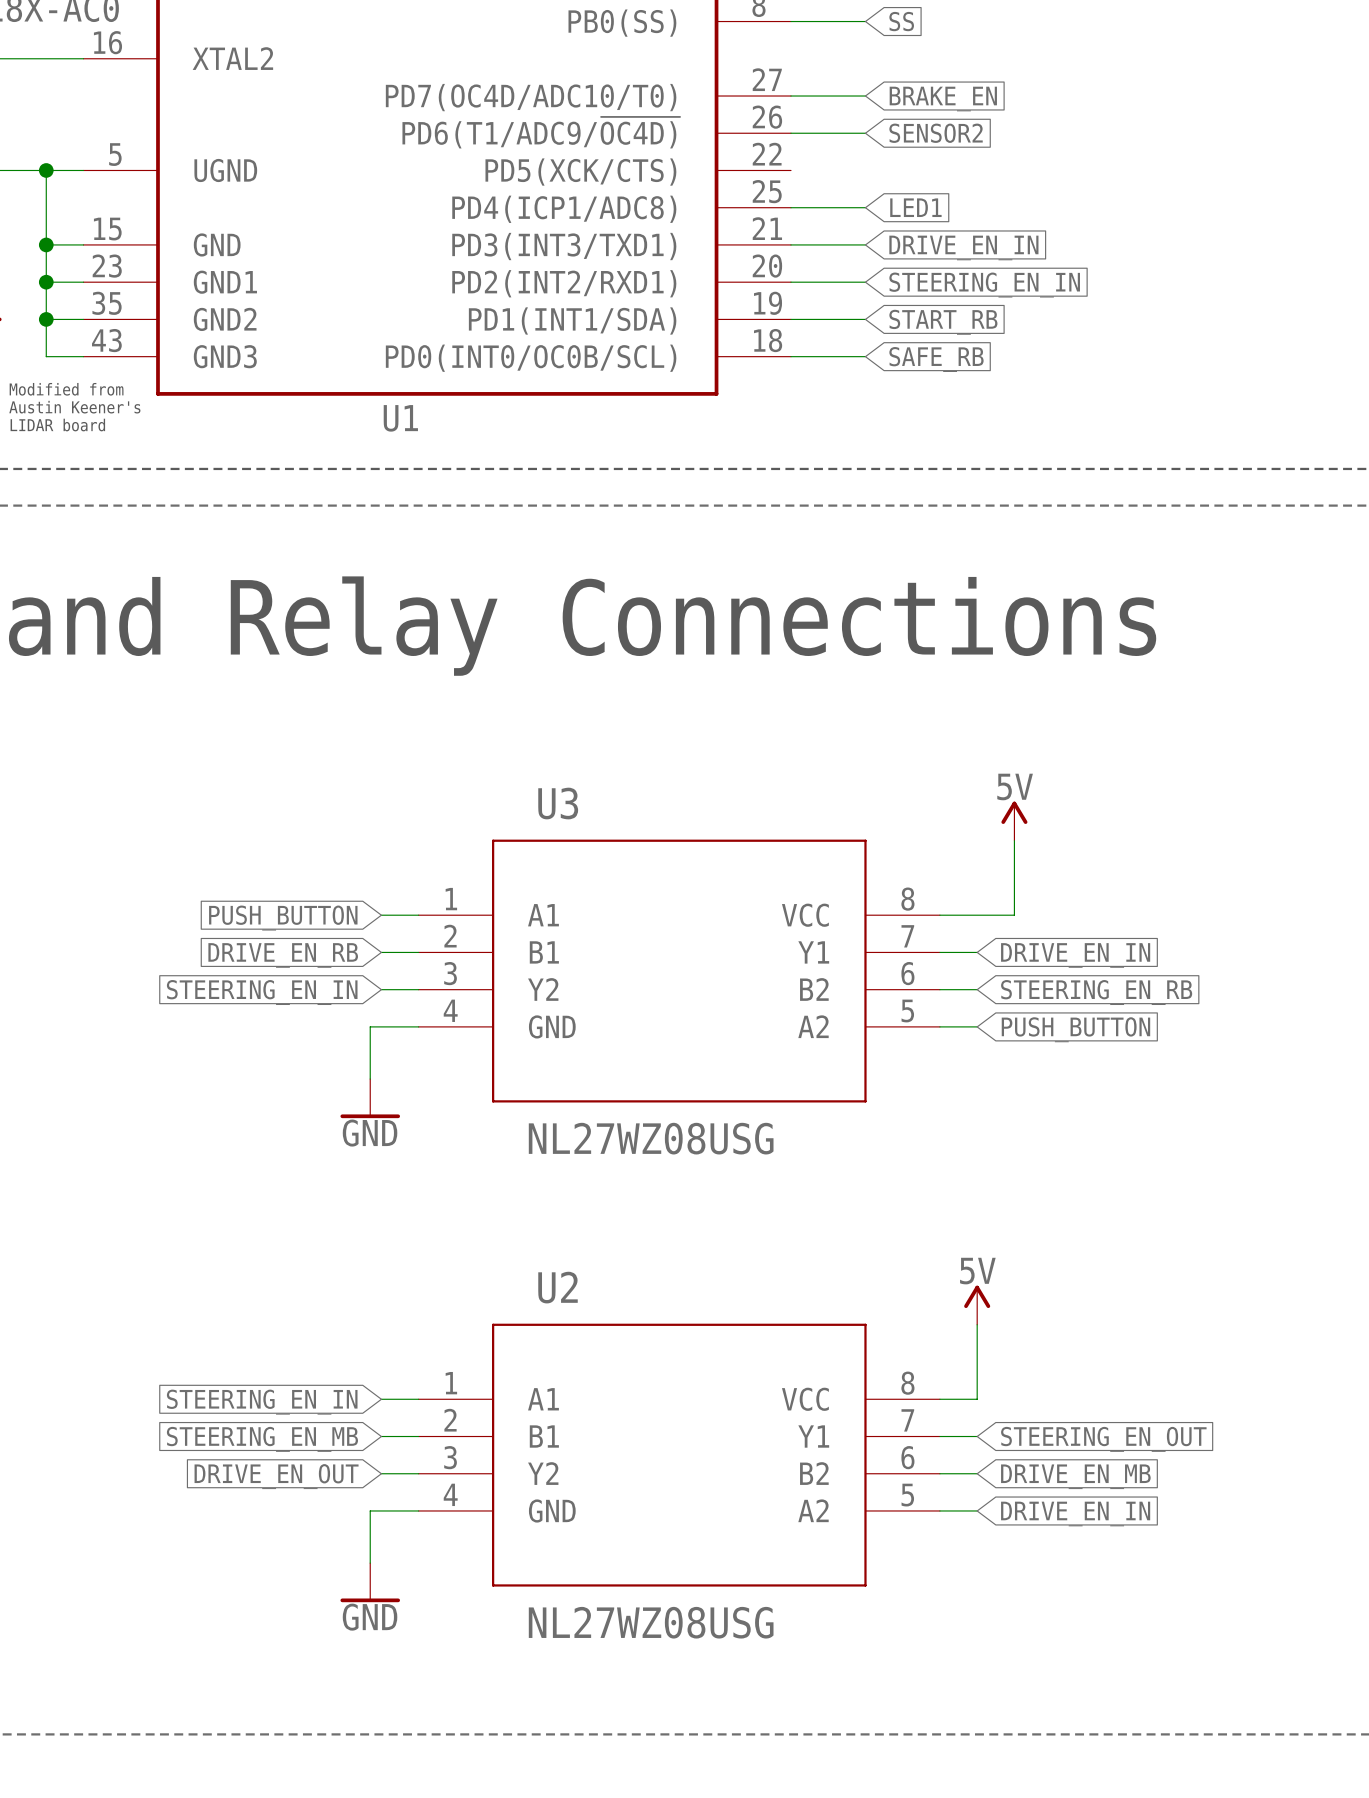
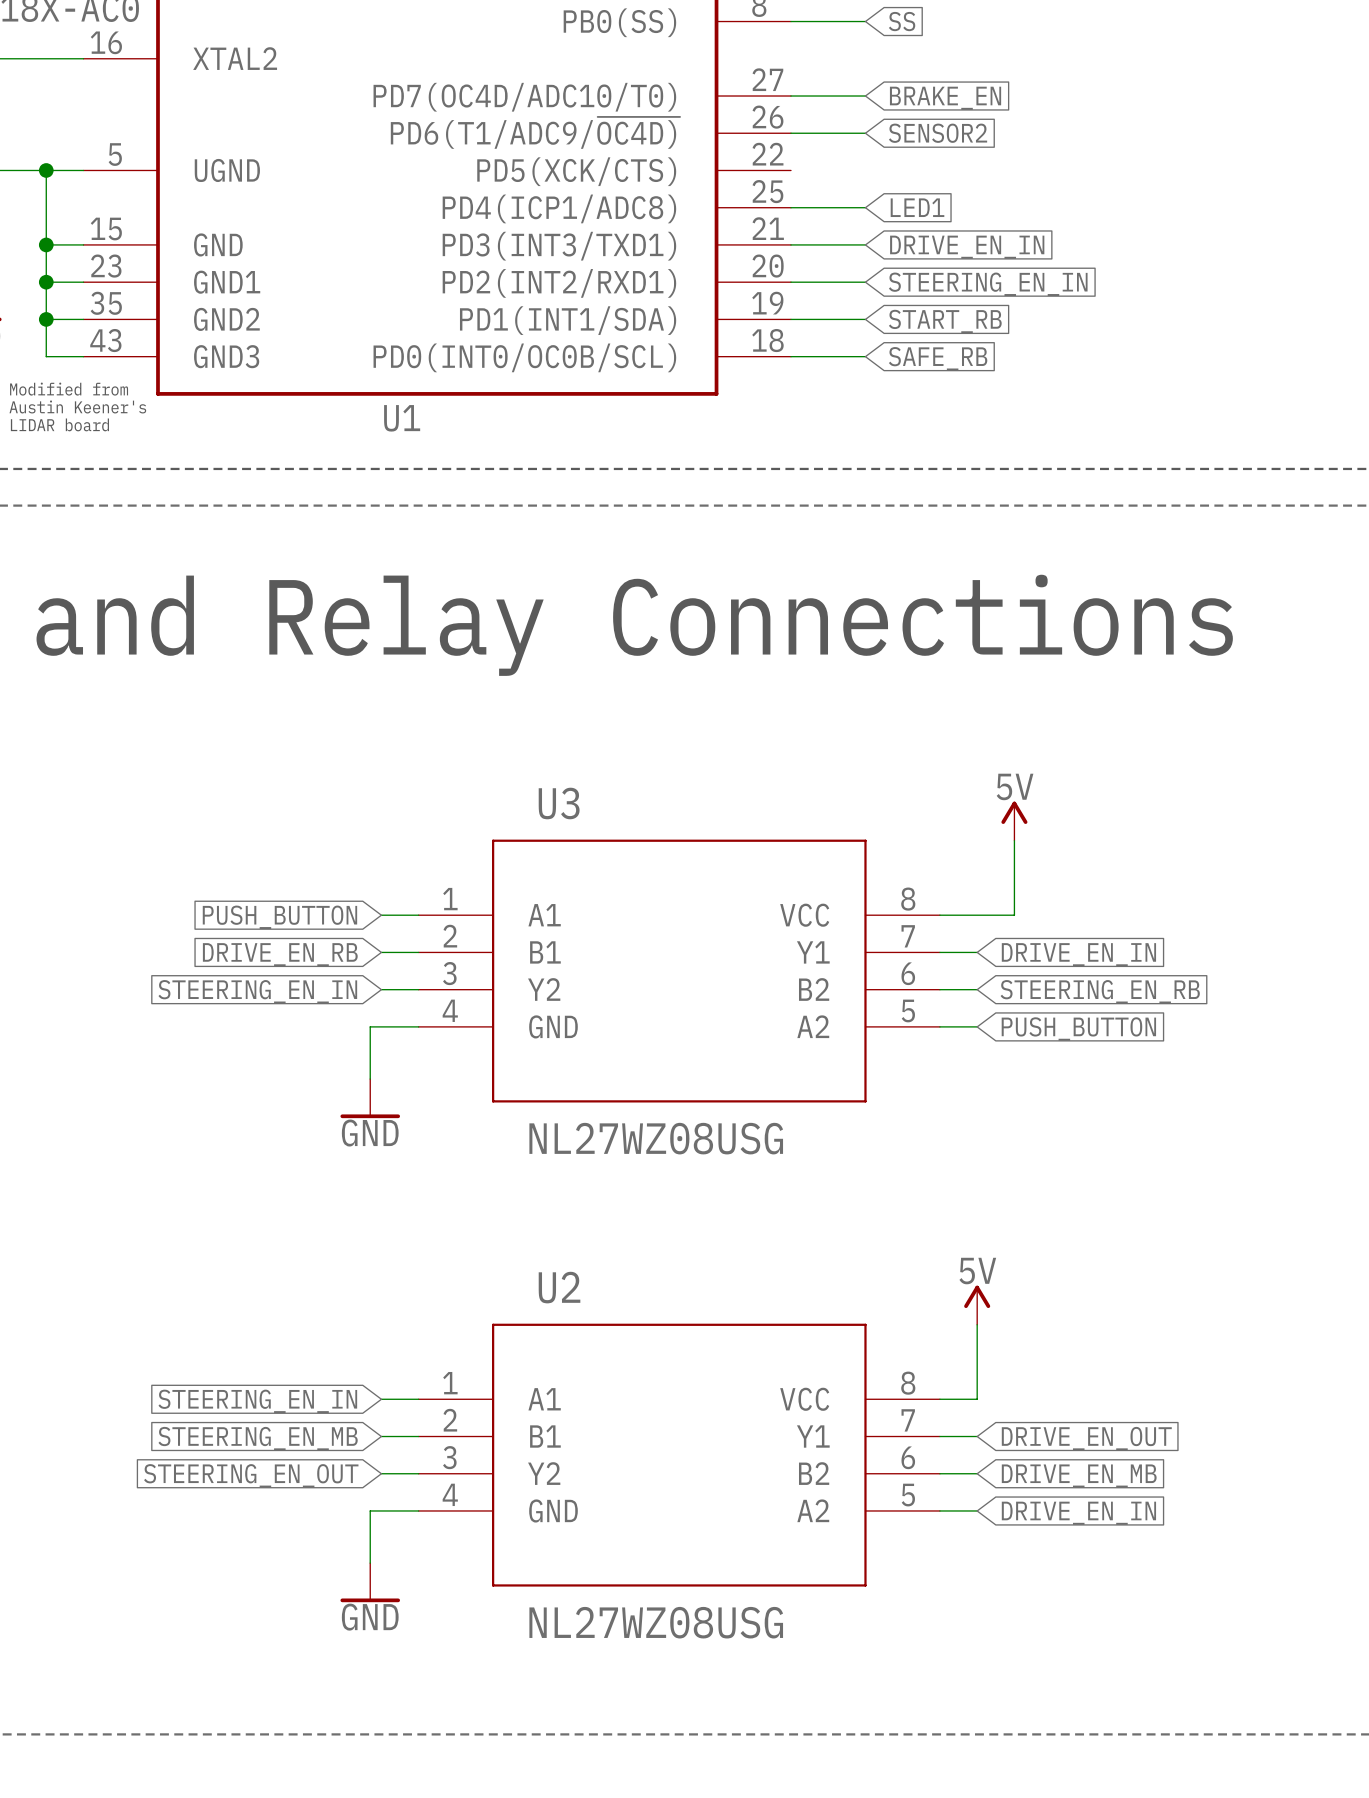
global label: STEERING_EN_OUT (1103, 1439) -> DRIVE_EN_OUT (1086, 1438)
global label: DRIVE_EN_OUT (276, 1476) -> STEERING_EN_OUT (251, 1475)

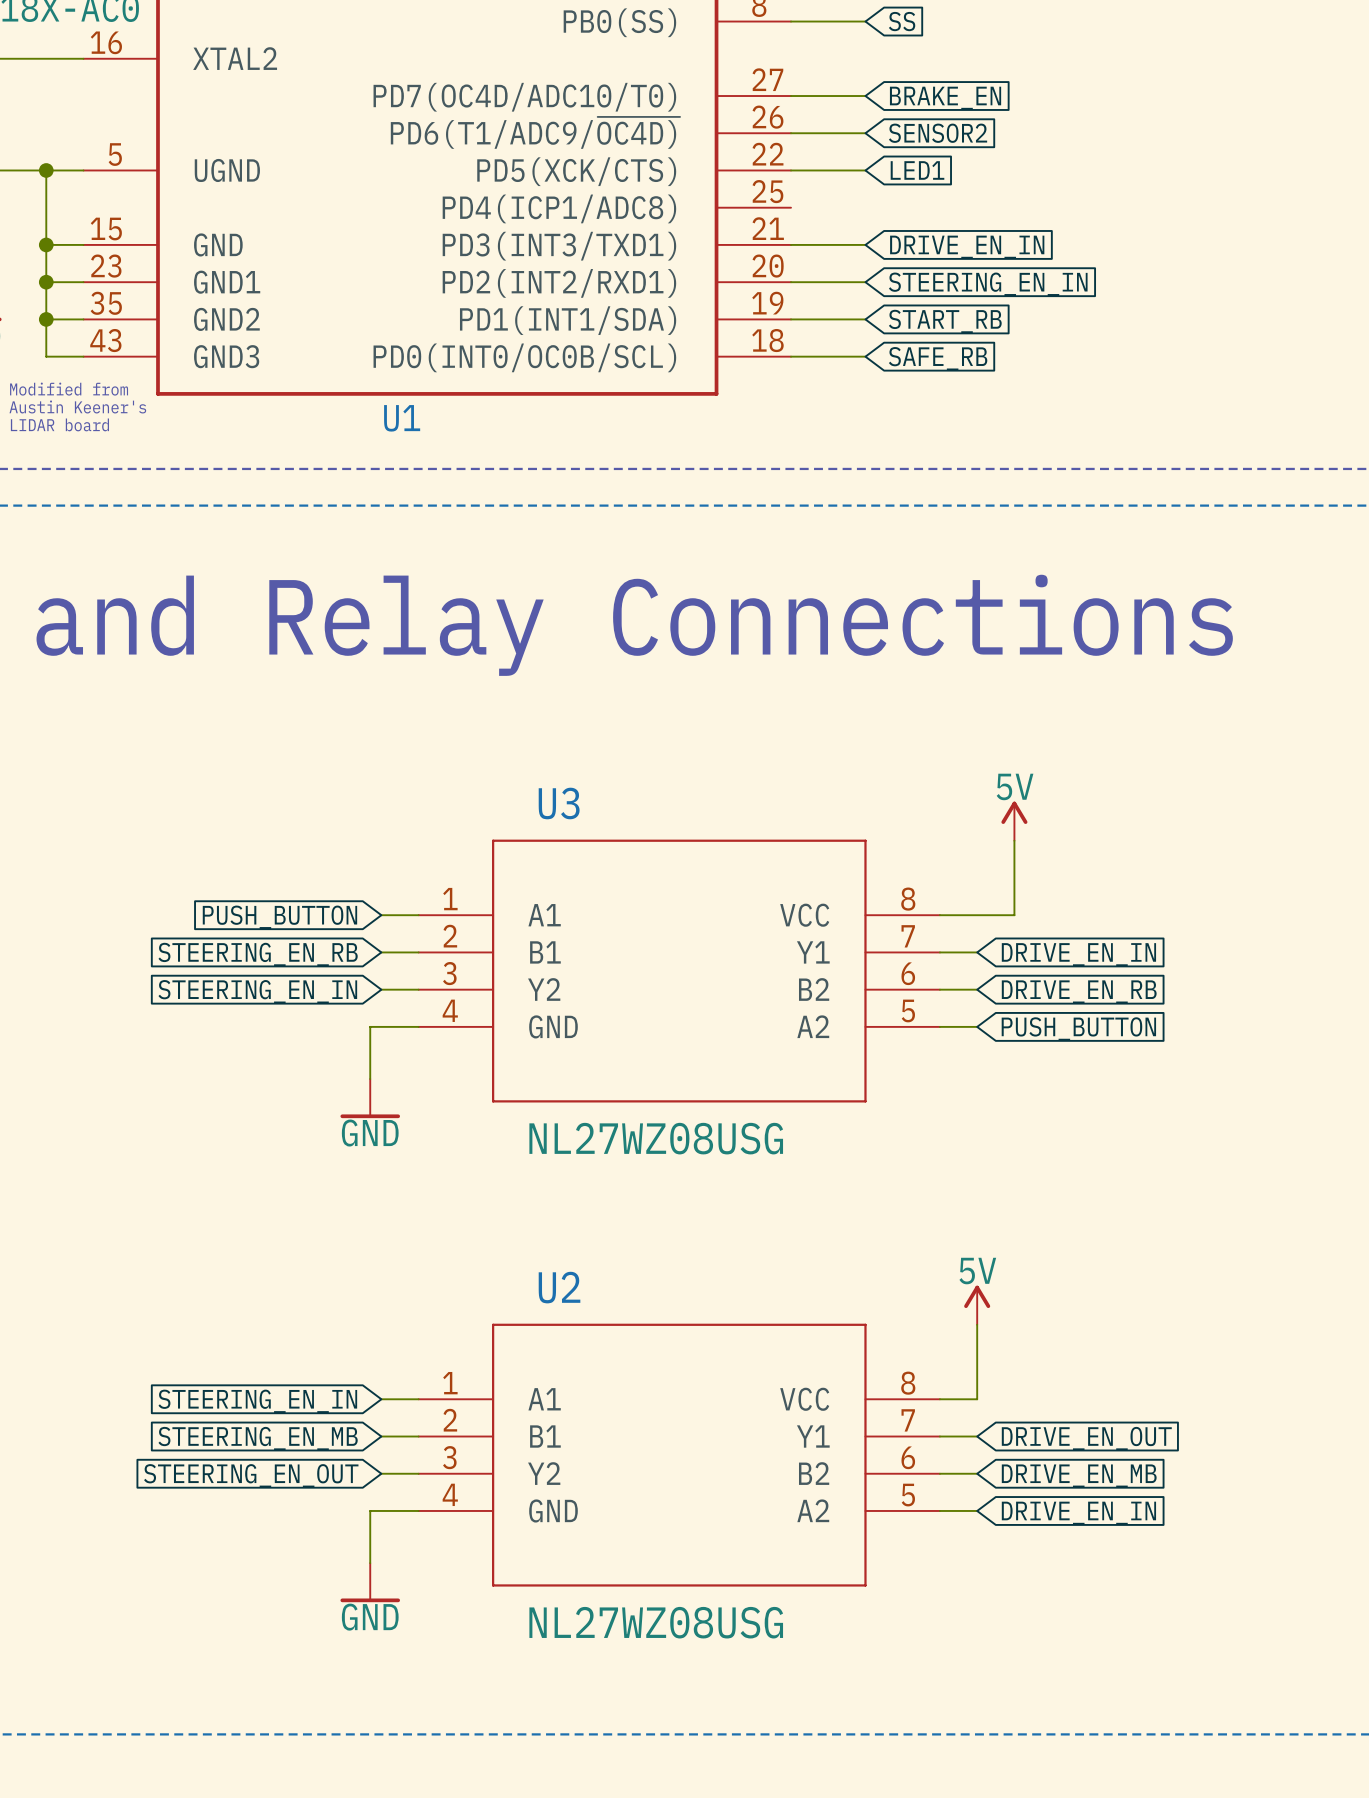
wire: (791, 207) (865, 207) -> (791, 170) (865, 170)
global label position: LED1 (917, 207) -> LED1 (917, 170)
global label: DRIVE_EN_RB (280, 954) -> STEERING_EN_RB (258, 954)
global label: STEERING_EN_RB (1100, 991) -> DRIVE_EN_RB (1079, 991)

